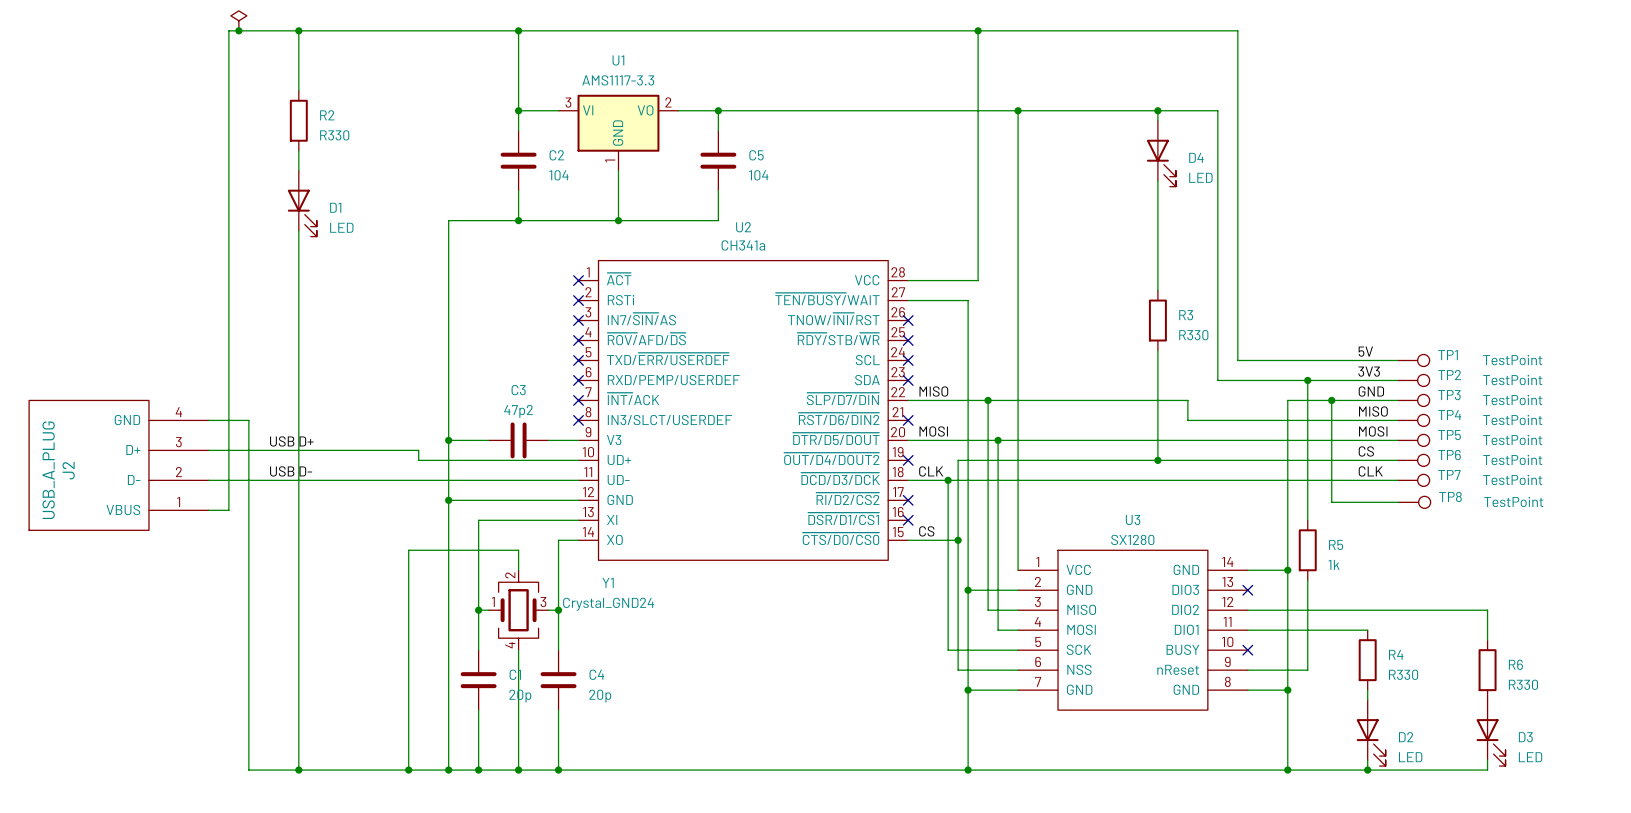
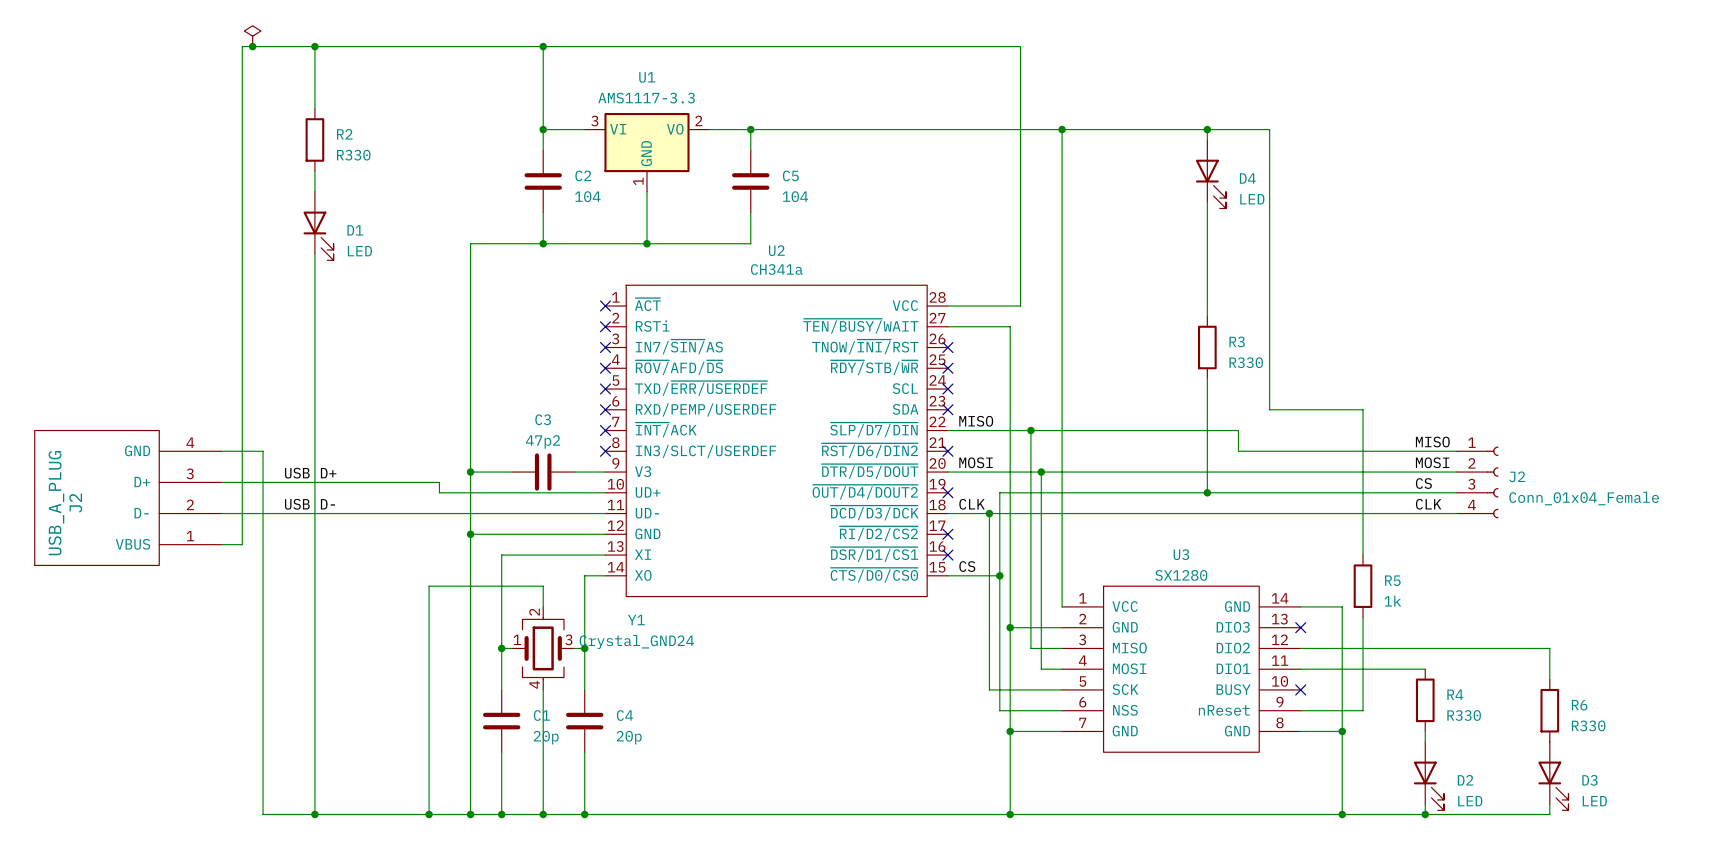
wire: (978, 30) (1237, 30) (1237, 360) (1397, 360) -> none
junction: (978, 30) -> none
label: 5V (1365, 351) -> none
TP1: TestPoint (1413, 360) -> none
label: 3V3 (1369, 371) -> none
wire: (1307, 380) (1397, 380) -> none
junction: (1307, 380) -> none
TP2: TestPoint (1413, 380) -> none
label: GND (1371, 391) -> none
wire: (1331, 400) (1331, 502) (1398, 502) -> none
junction: (1331, 400) -> none
wire: (1397, 400) (1287, 400) (1287, 570) -> none
TP3: TestPoint (1413, 400) -> none
TP4: TestPoint (1413, 420) -> none
TP5: TestPoint (1413, 440) -> none
J2: none -> Conn_01x04_Female (1477, 482)
TP6: TestPoint (1413, 460) -> none
TP7: TestPoint (1413, 480) -> none
TP8: TestPoint (1414, 502) -> none
junction: (1287, 570) -> none

